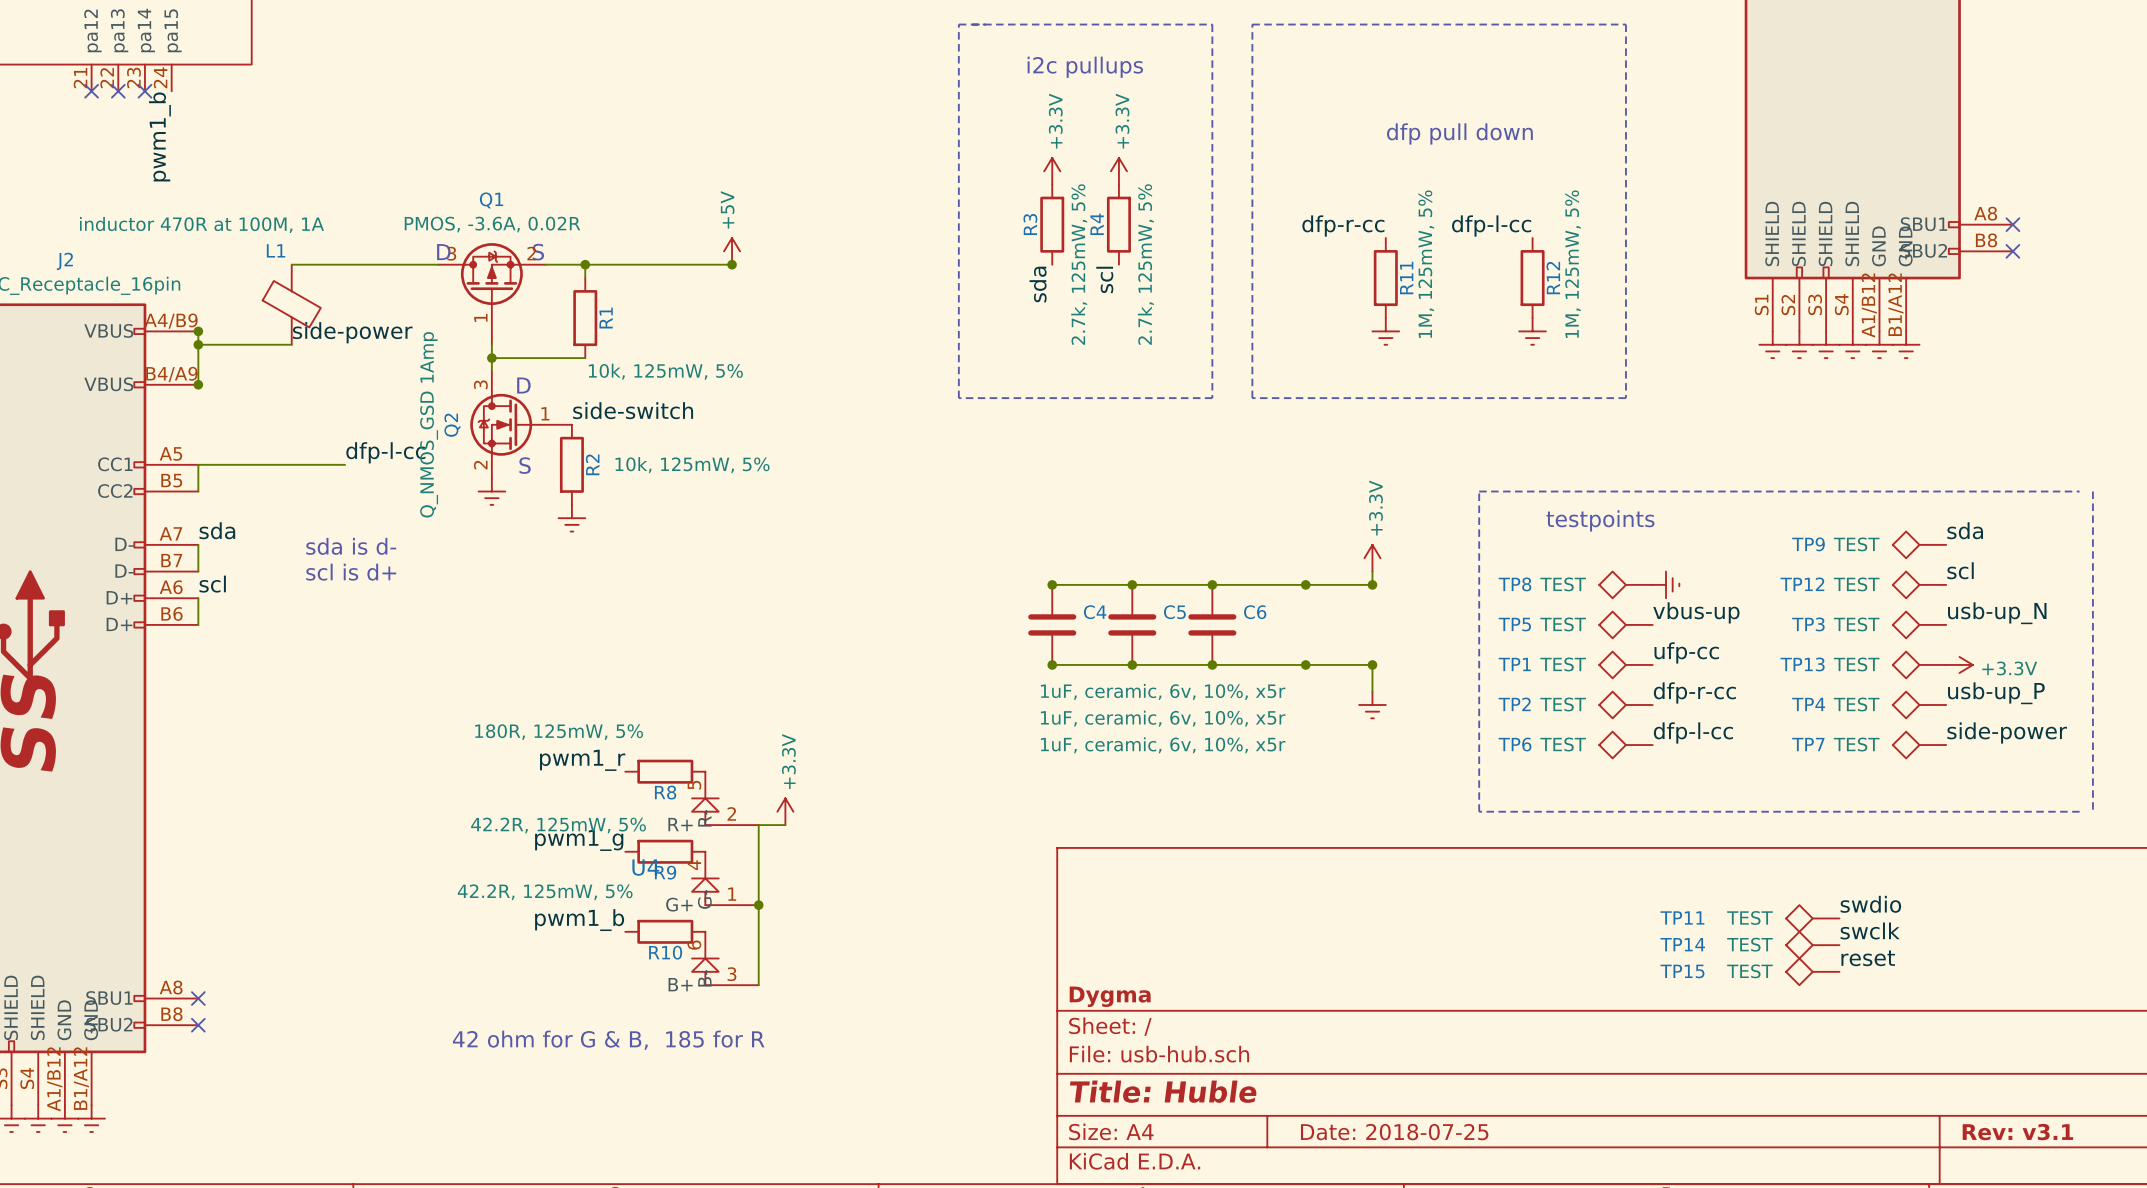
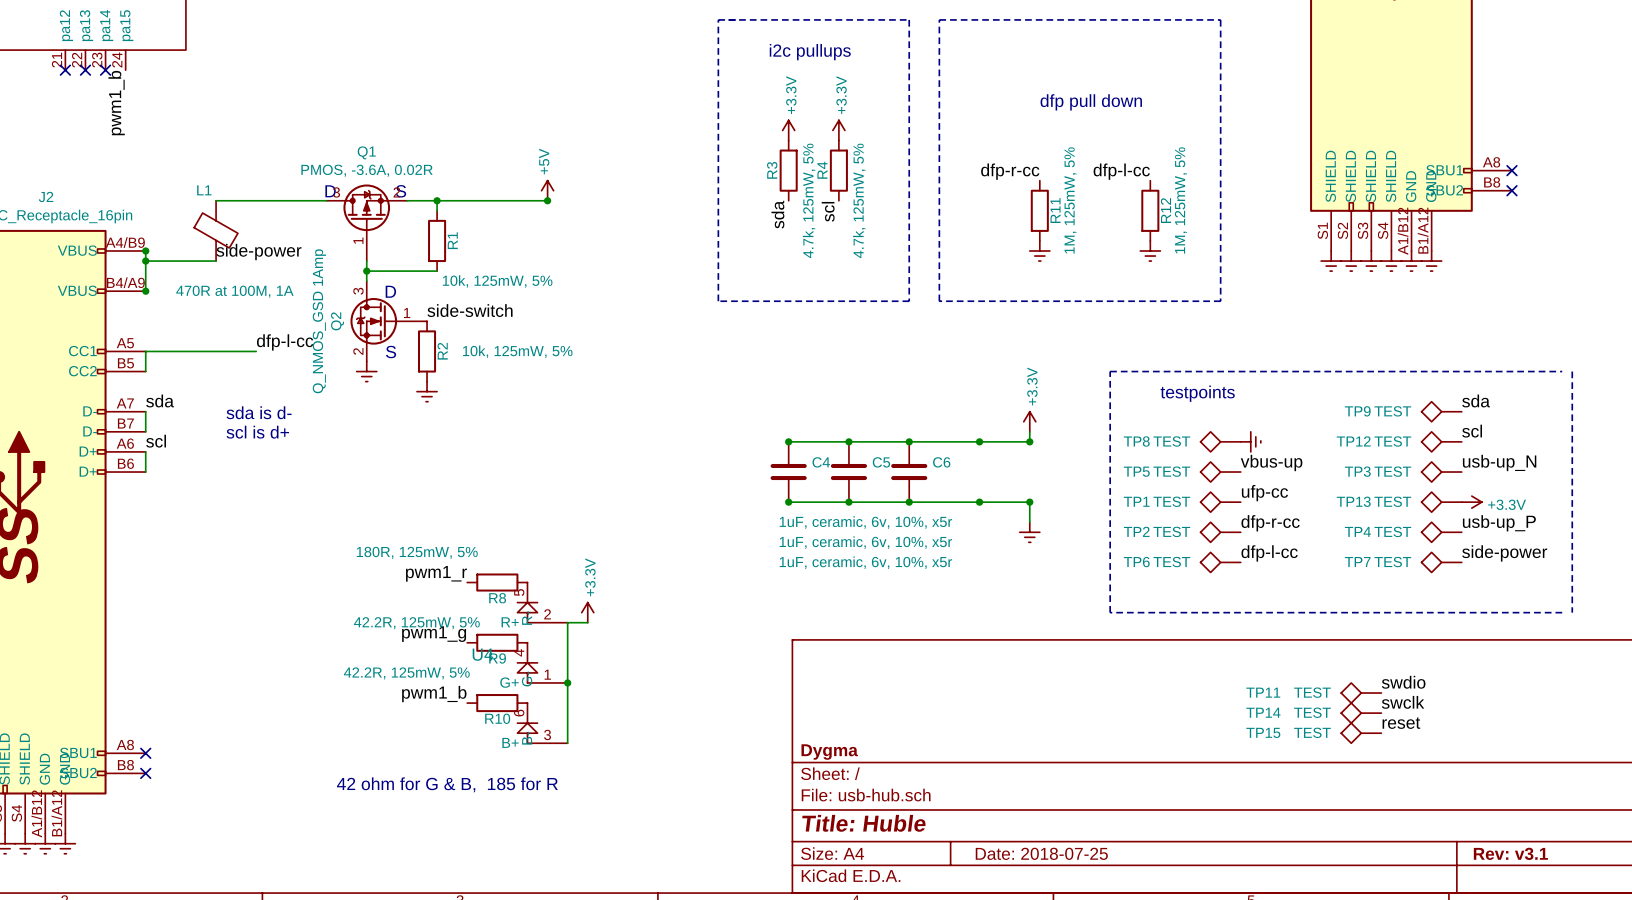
L1 value: inductor 470R at 100M, 1A (201, 224) -> 470R at 100M, 1A (234, 291)
R3 value: 2.7k, 125mW, 5% (1079, 264) -> 4.7k, 125mW, 5% (809, 200)
R4 value: 2.7k, 125mW, 5% (1145, 264) -> 4.7k, 125mW, 5% (859, 200)

